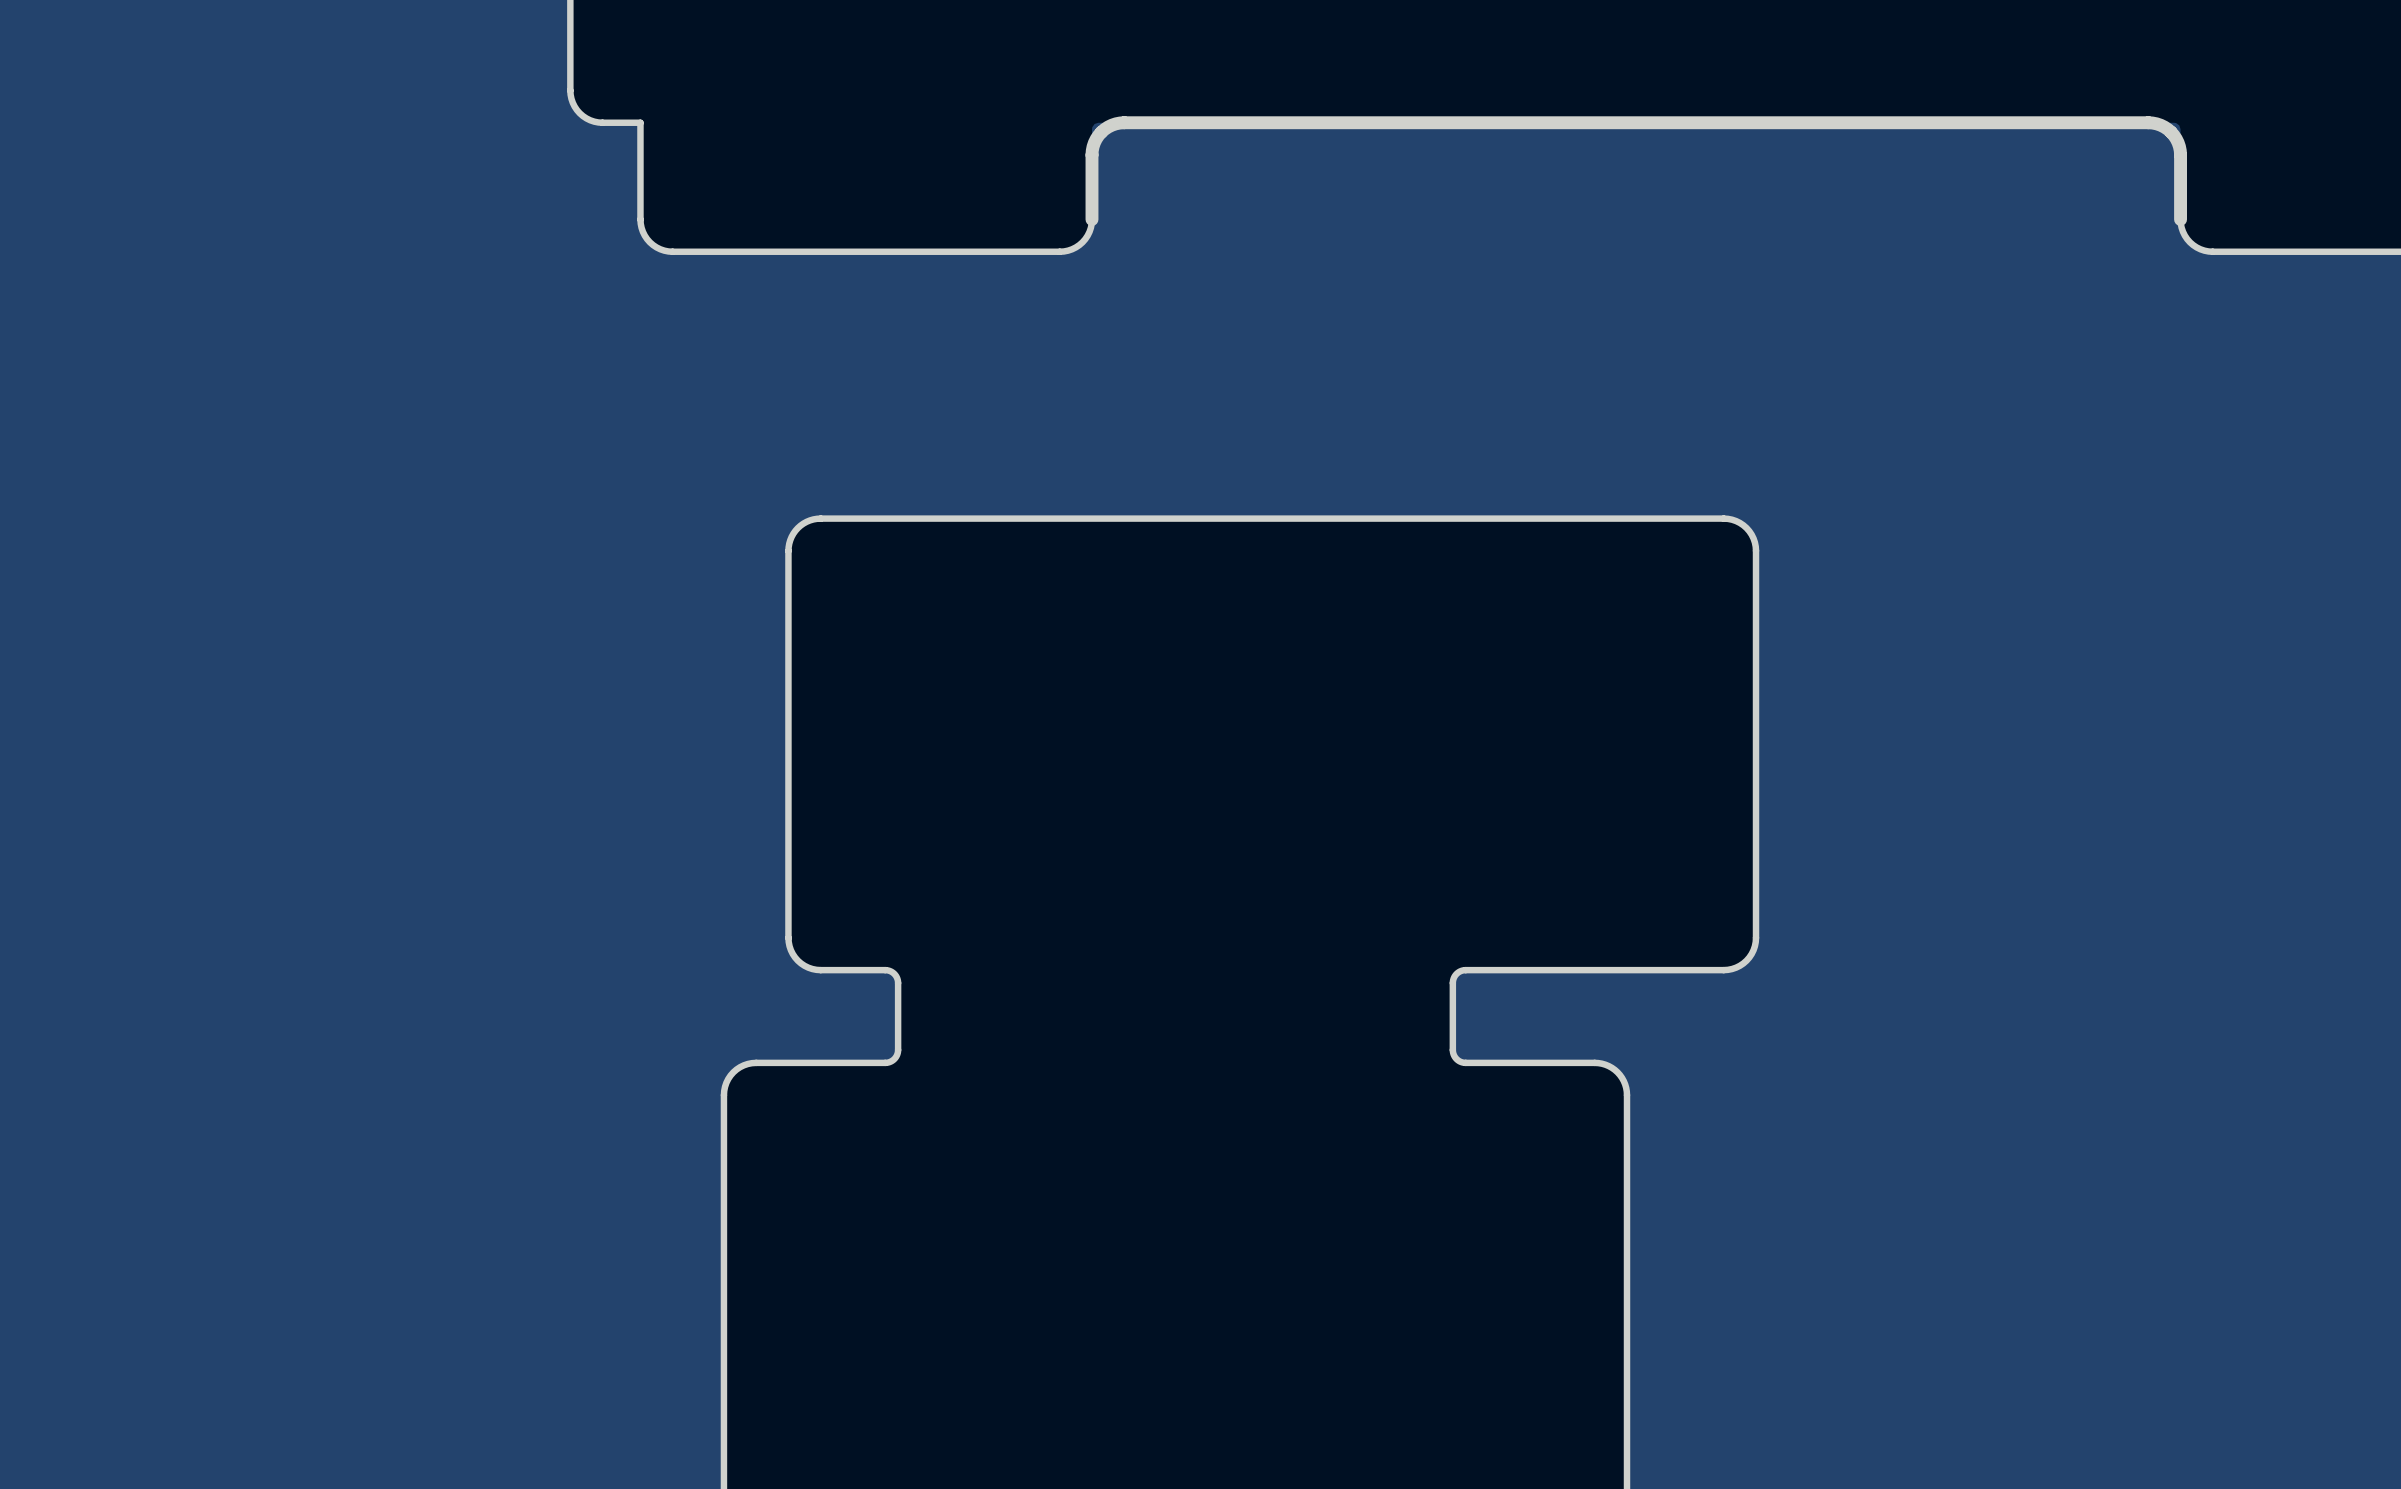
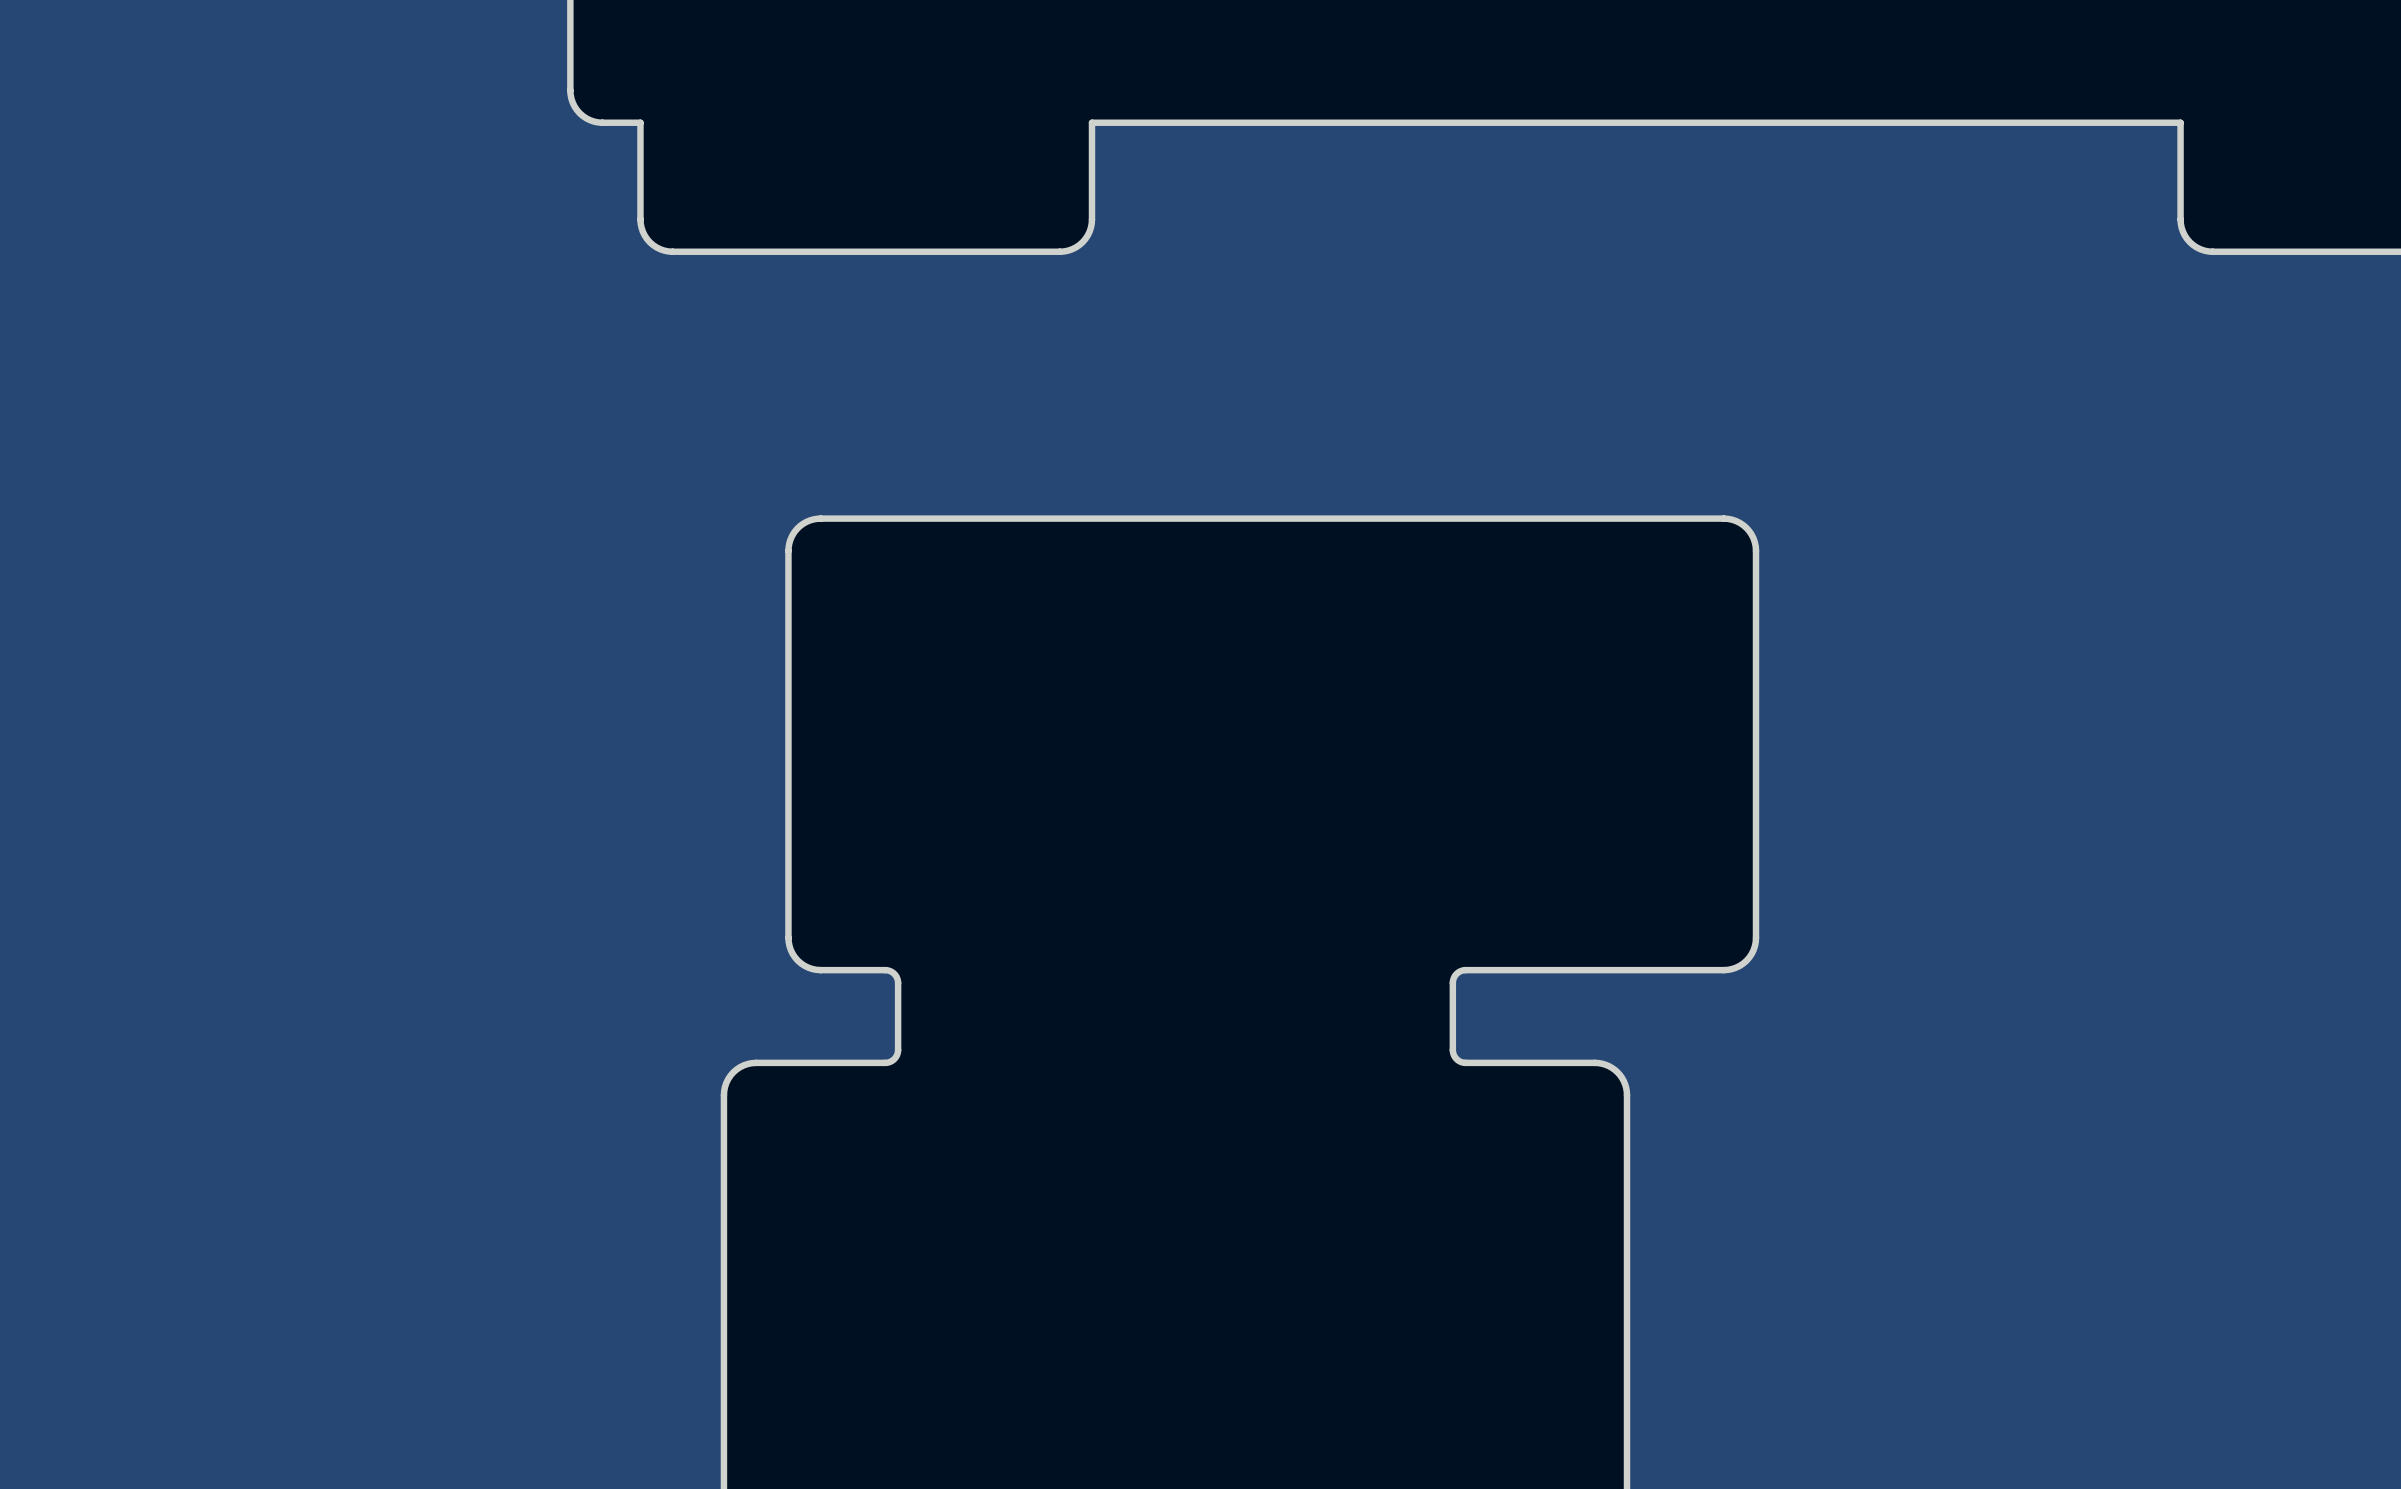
board edge: (1124, 122) (1111, 125) (1101, 132) (1094, 142) (1091, 154) -> (1124, 122) (1091, 122) (1091, 154)
board edge: (2148, 122) (2160, 125) (2171, 132) (2178, 142) (2180, 154) -> (2148, 122) (2180, 122) (2180, 154)
board edge width: thick (2148, 122) (1124, 122) -> thin (2148, 122) (1124, 122)
board edge width: thick (1091, 154) (1091, 219) -> thin (1091, 154) (1091, 219)
board edge width: thick (2180, 154) (2180, 219) -> thin (2180, 154) (2180, 219)

